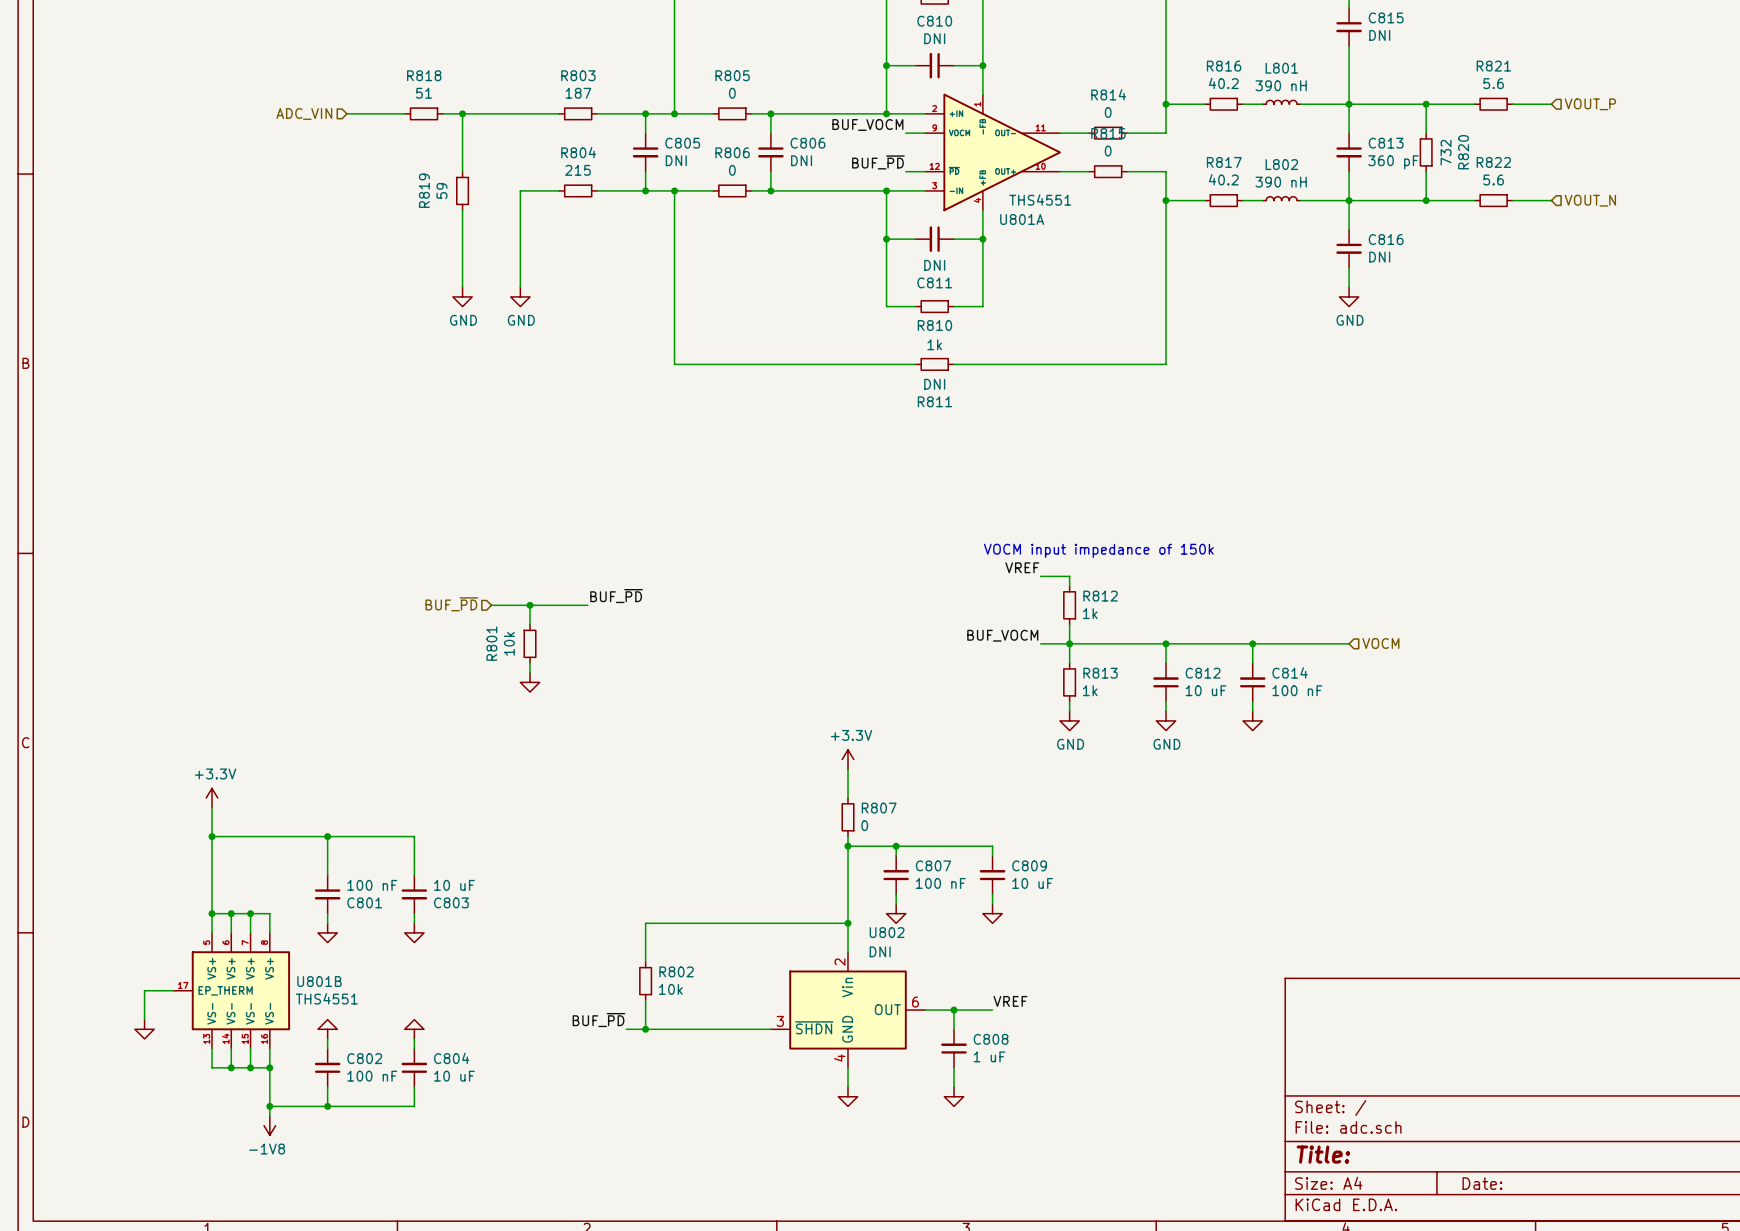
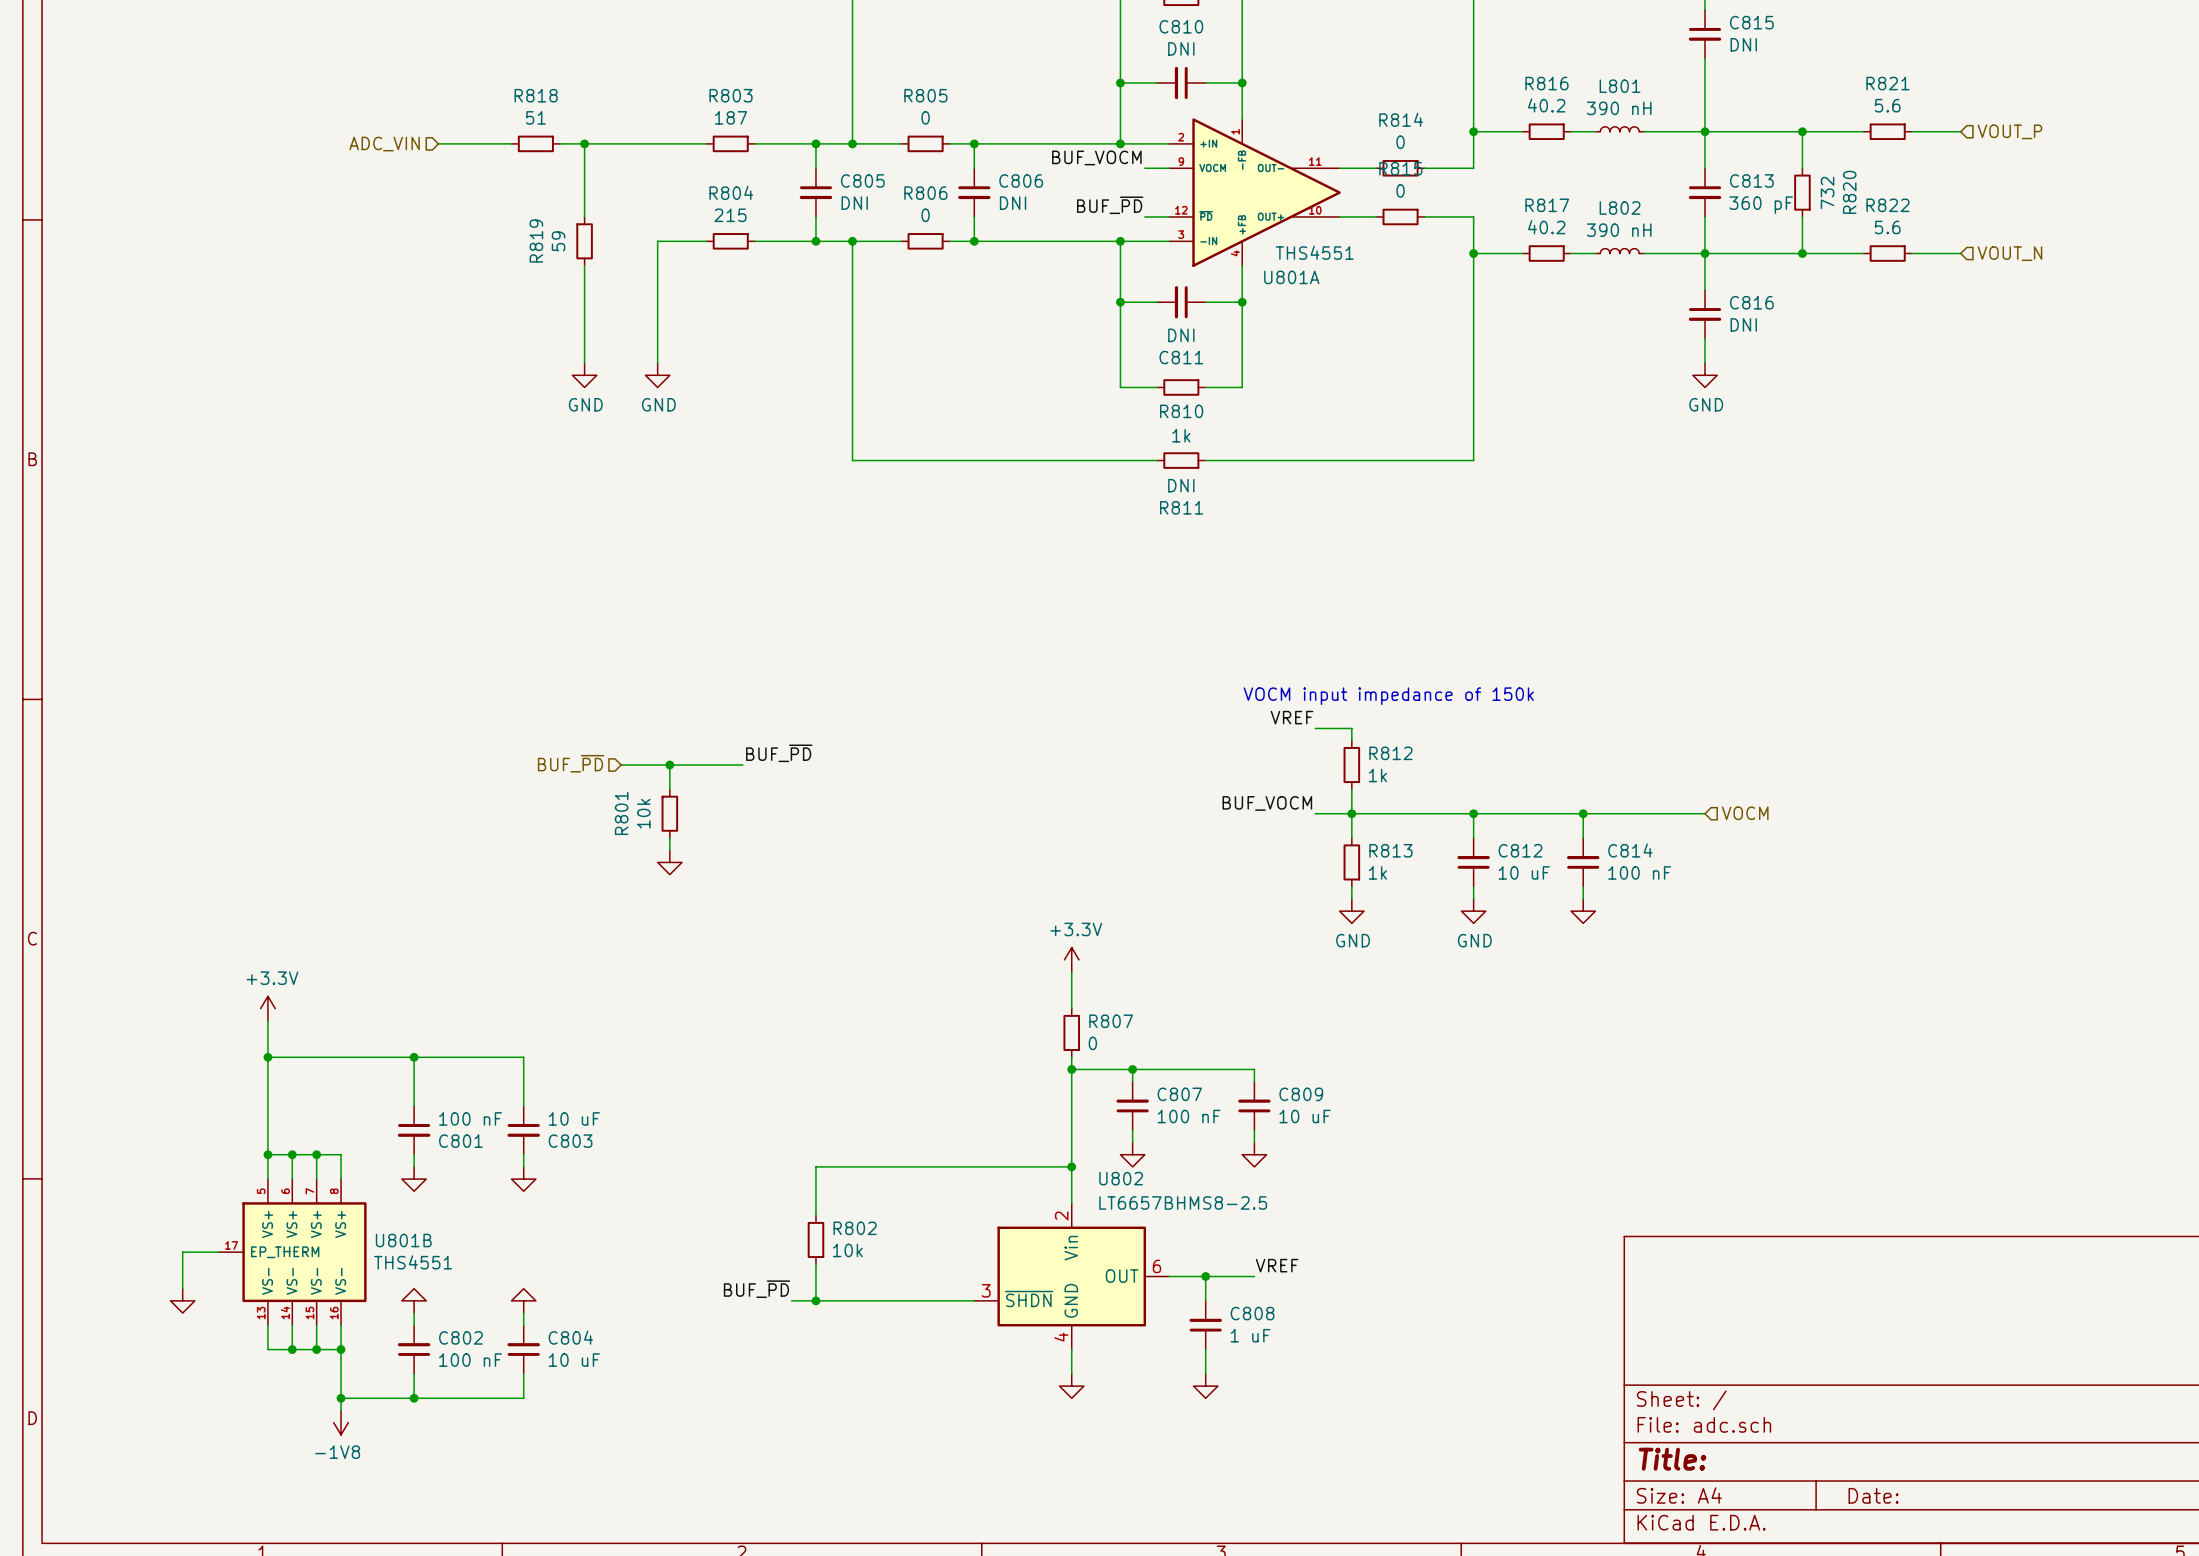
U802 value: DNI (880, 951) -> LT6657BHMS8-2.5 (1183, 1202)

